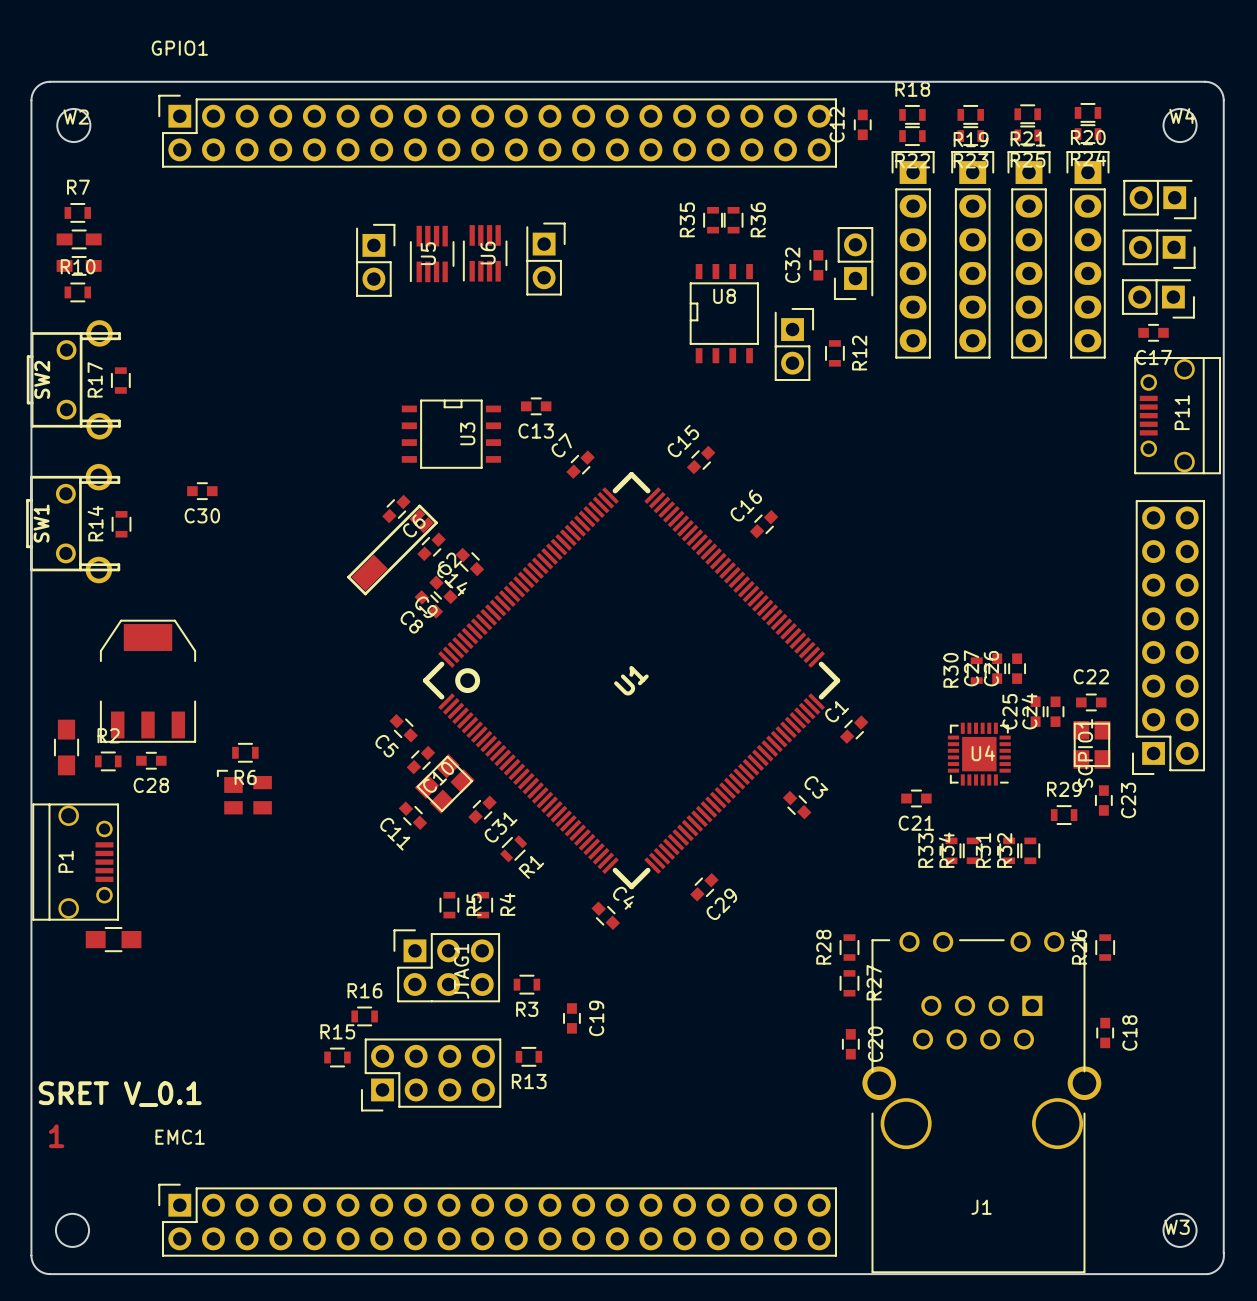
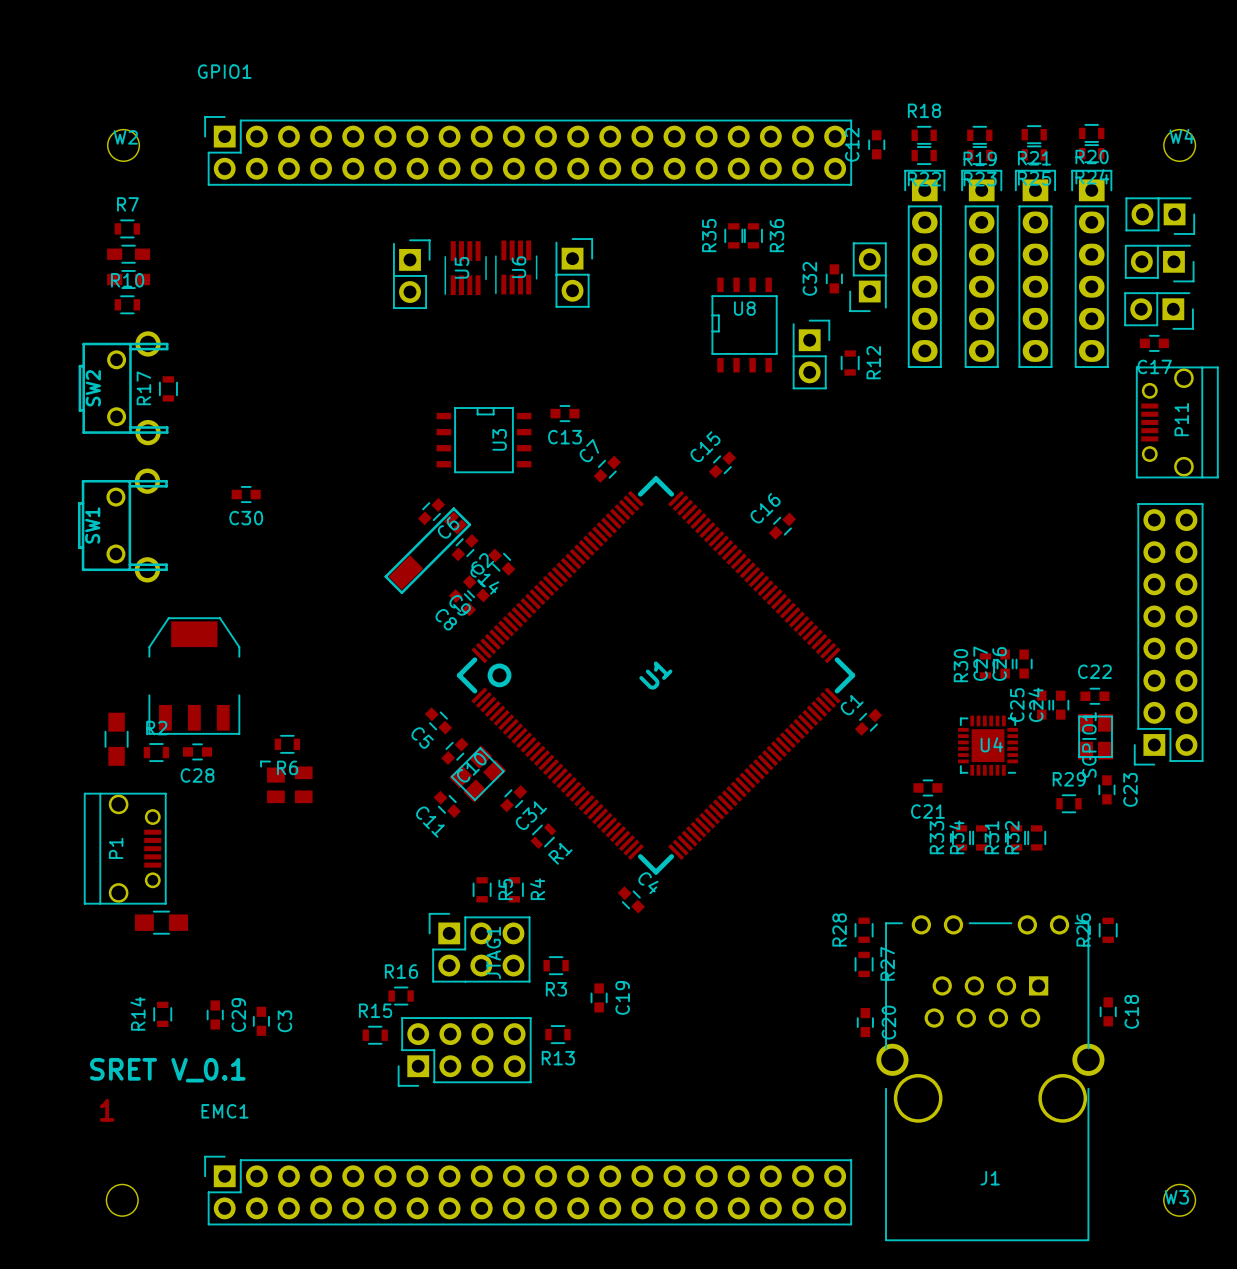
board edge: (49, 81) (1205, 81) (1218, 87) (1223, 100) (1223, 1255) (1218, 1268) (1207, 1274) (49, 1274) (36, 1268) (31, 1255) (31, 100) (36, 87) (49, 81) -> none
R14 position: (121, 524) -> (162, 1014)
C3 rotation: 0° (797, 805) -> 45° clockwise (261, 1021)
C3 position: (797, 805) -> (261, 1021)
C29 rotation: 0° (704, 887) -> 45° counterclockwise (215, 1015)
C29 position: (704, 887) -> (215, 1015)

